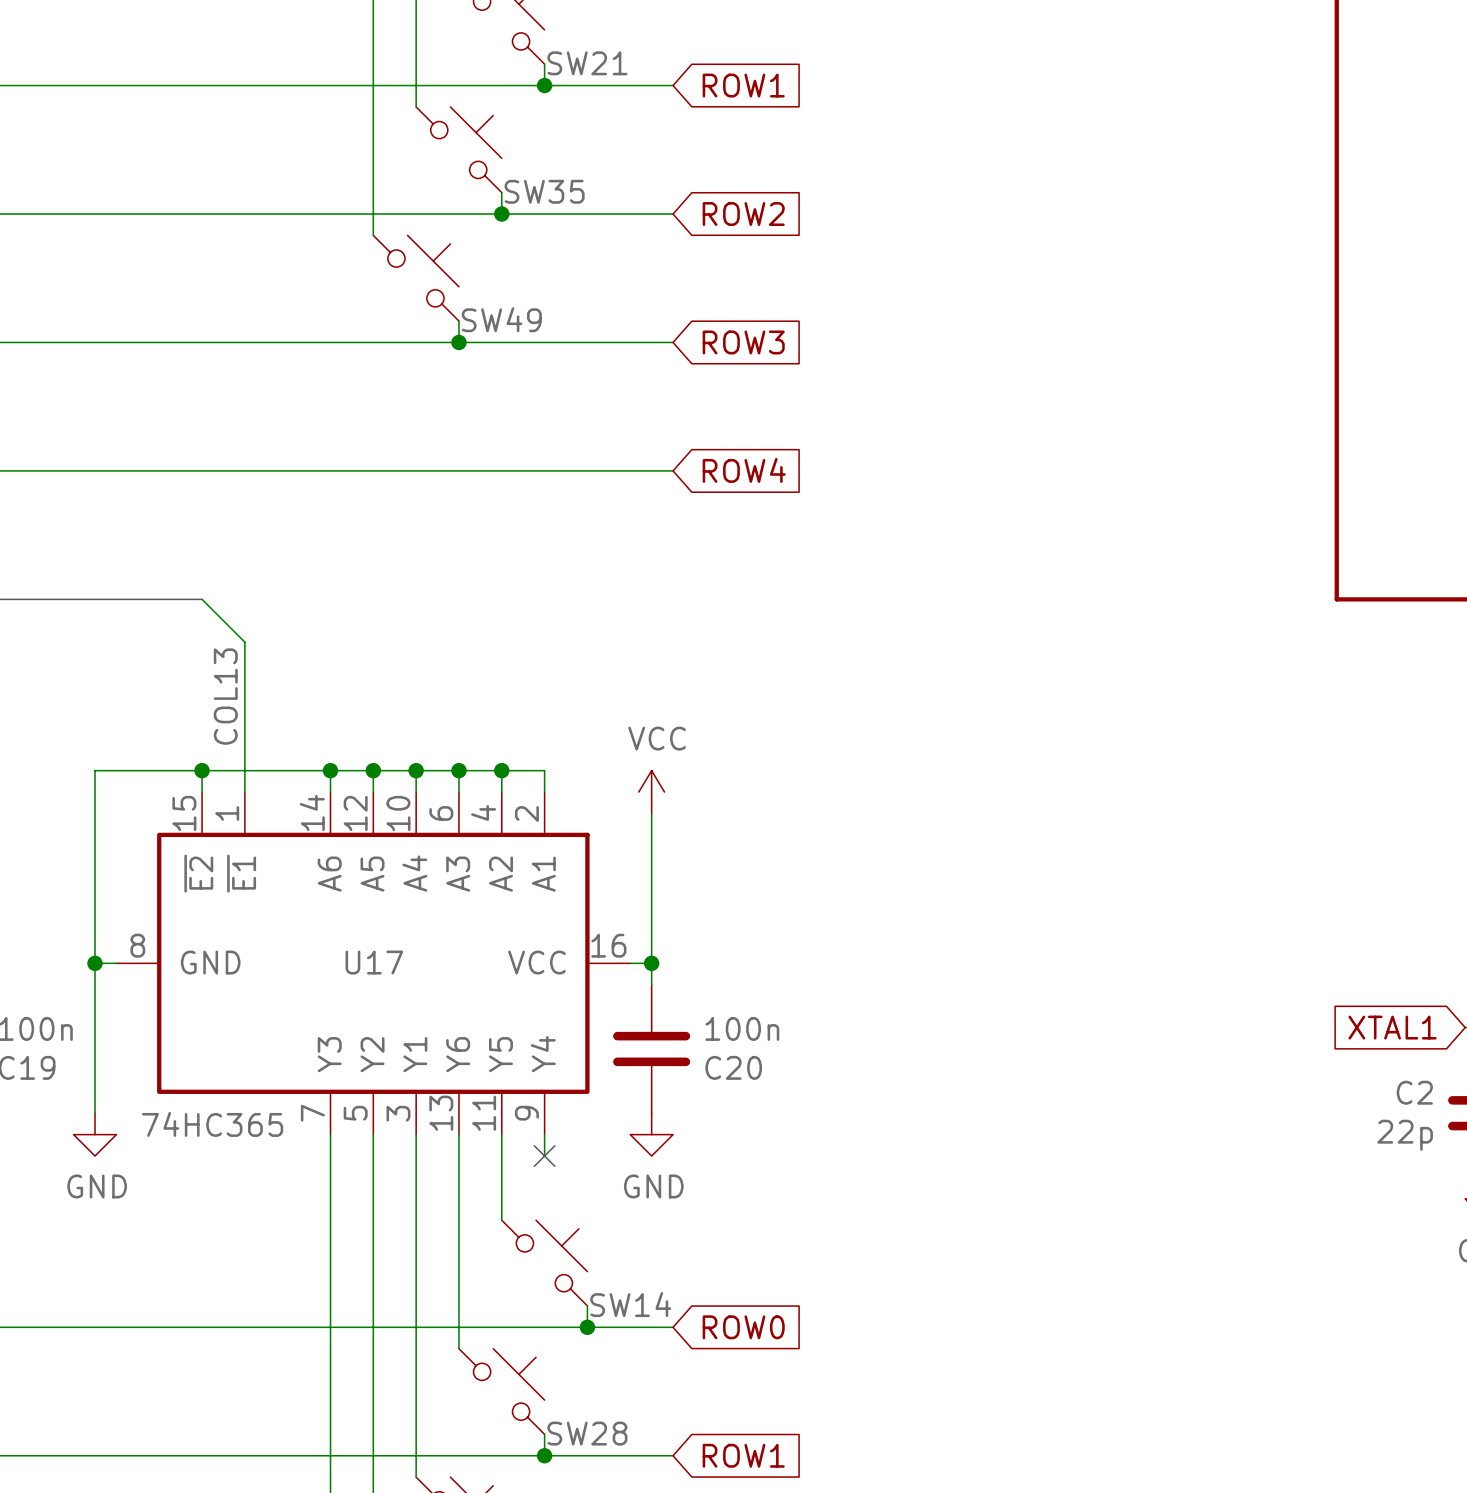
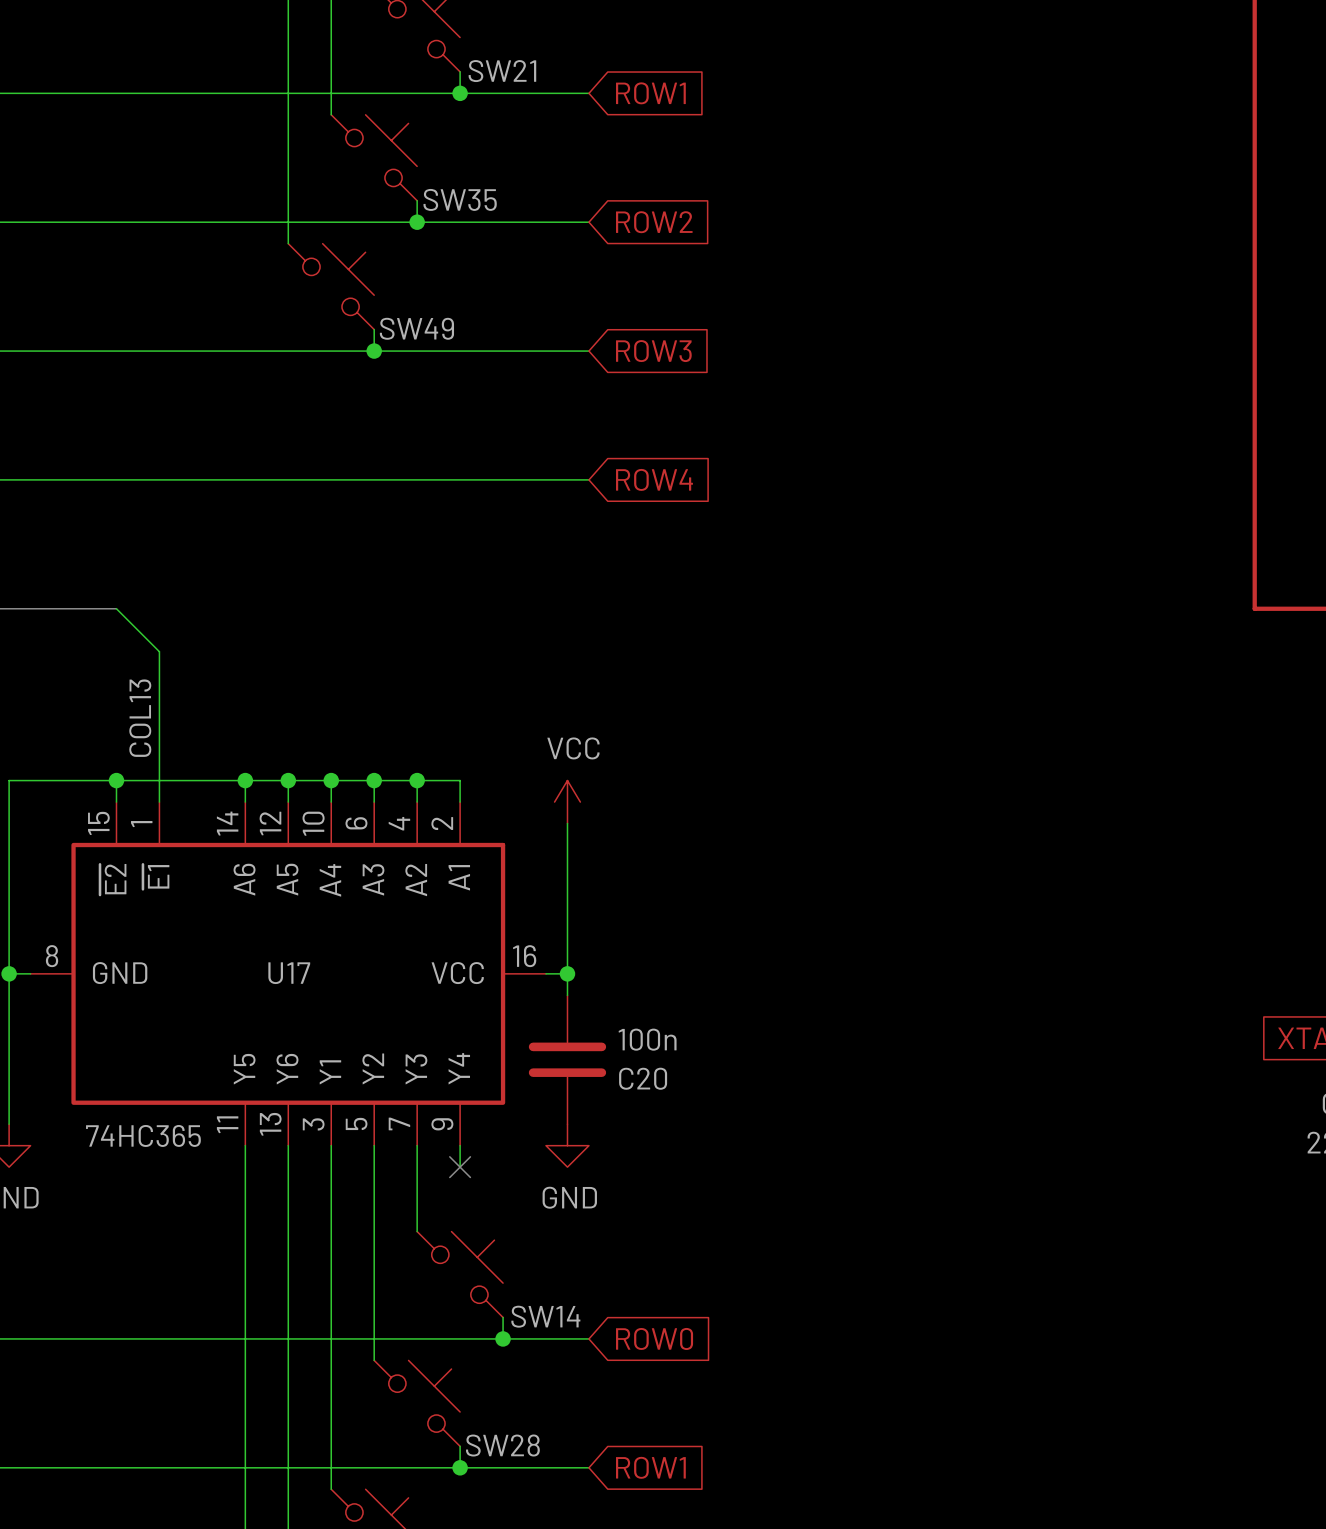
U17 pin name: Y3 (329, 1054) -> Y5 (244, 1069)
U17 pin name: Y2 (372, 1054) -> Y6 (287, 1069)
U17 pin name: Y6 (458, 1054) -> Y2 (373, 1068)
U17 pin name: Y5 (500, 1054) -> Y3 (416, 1069)
U17 pin number: 7 (312, 1113) -> 11 (227, 1124)
U17 pin number: 5 (355, 1113) -> 13 (270, 1124)
U17 pin number: 13 (441, 1113) -> 5 (356, 1123)
U17 pin number: 11 (484, 1113) -> 7 (399, 1123)

